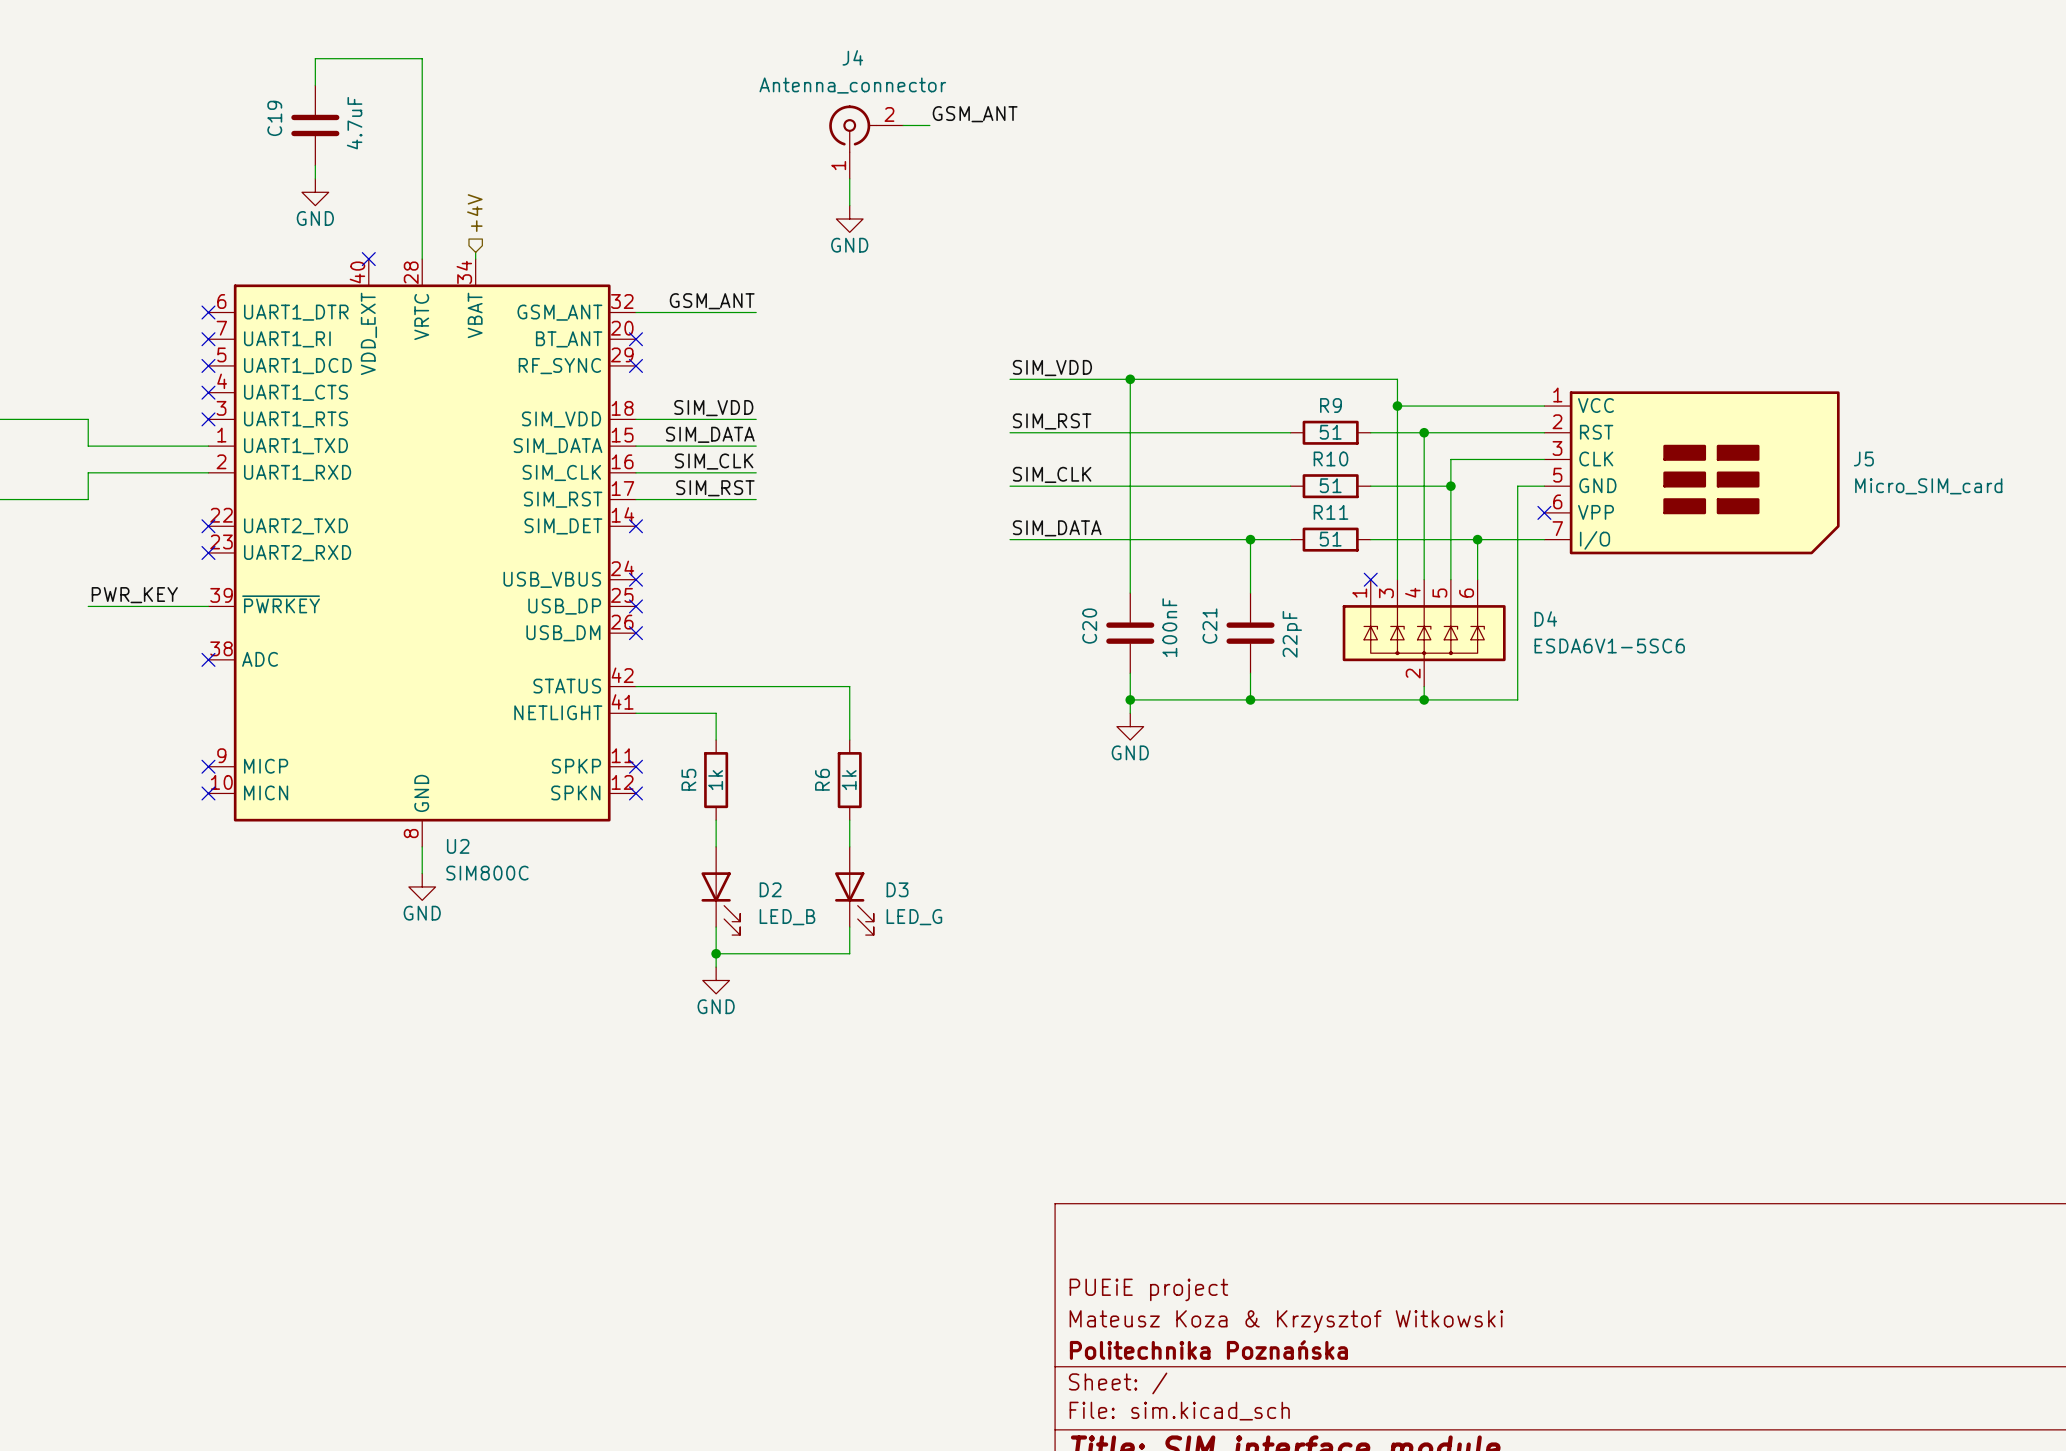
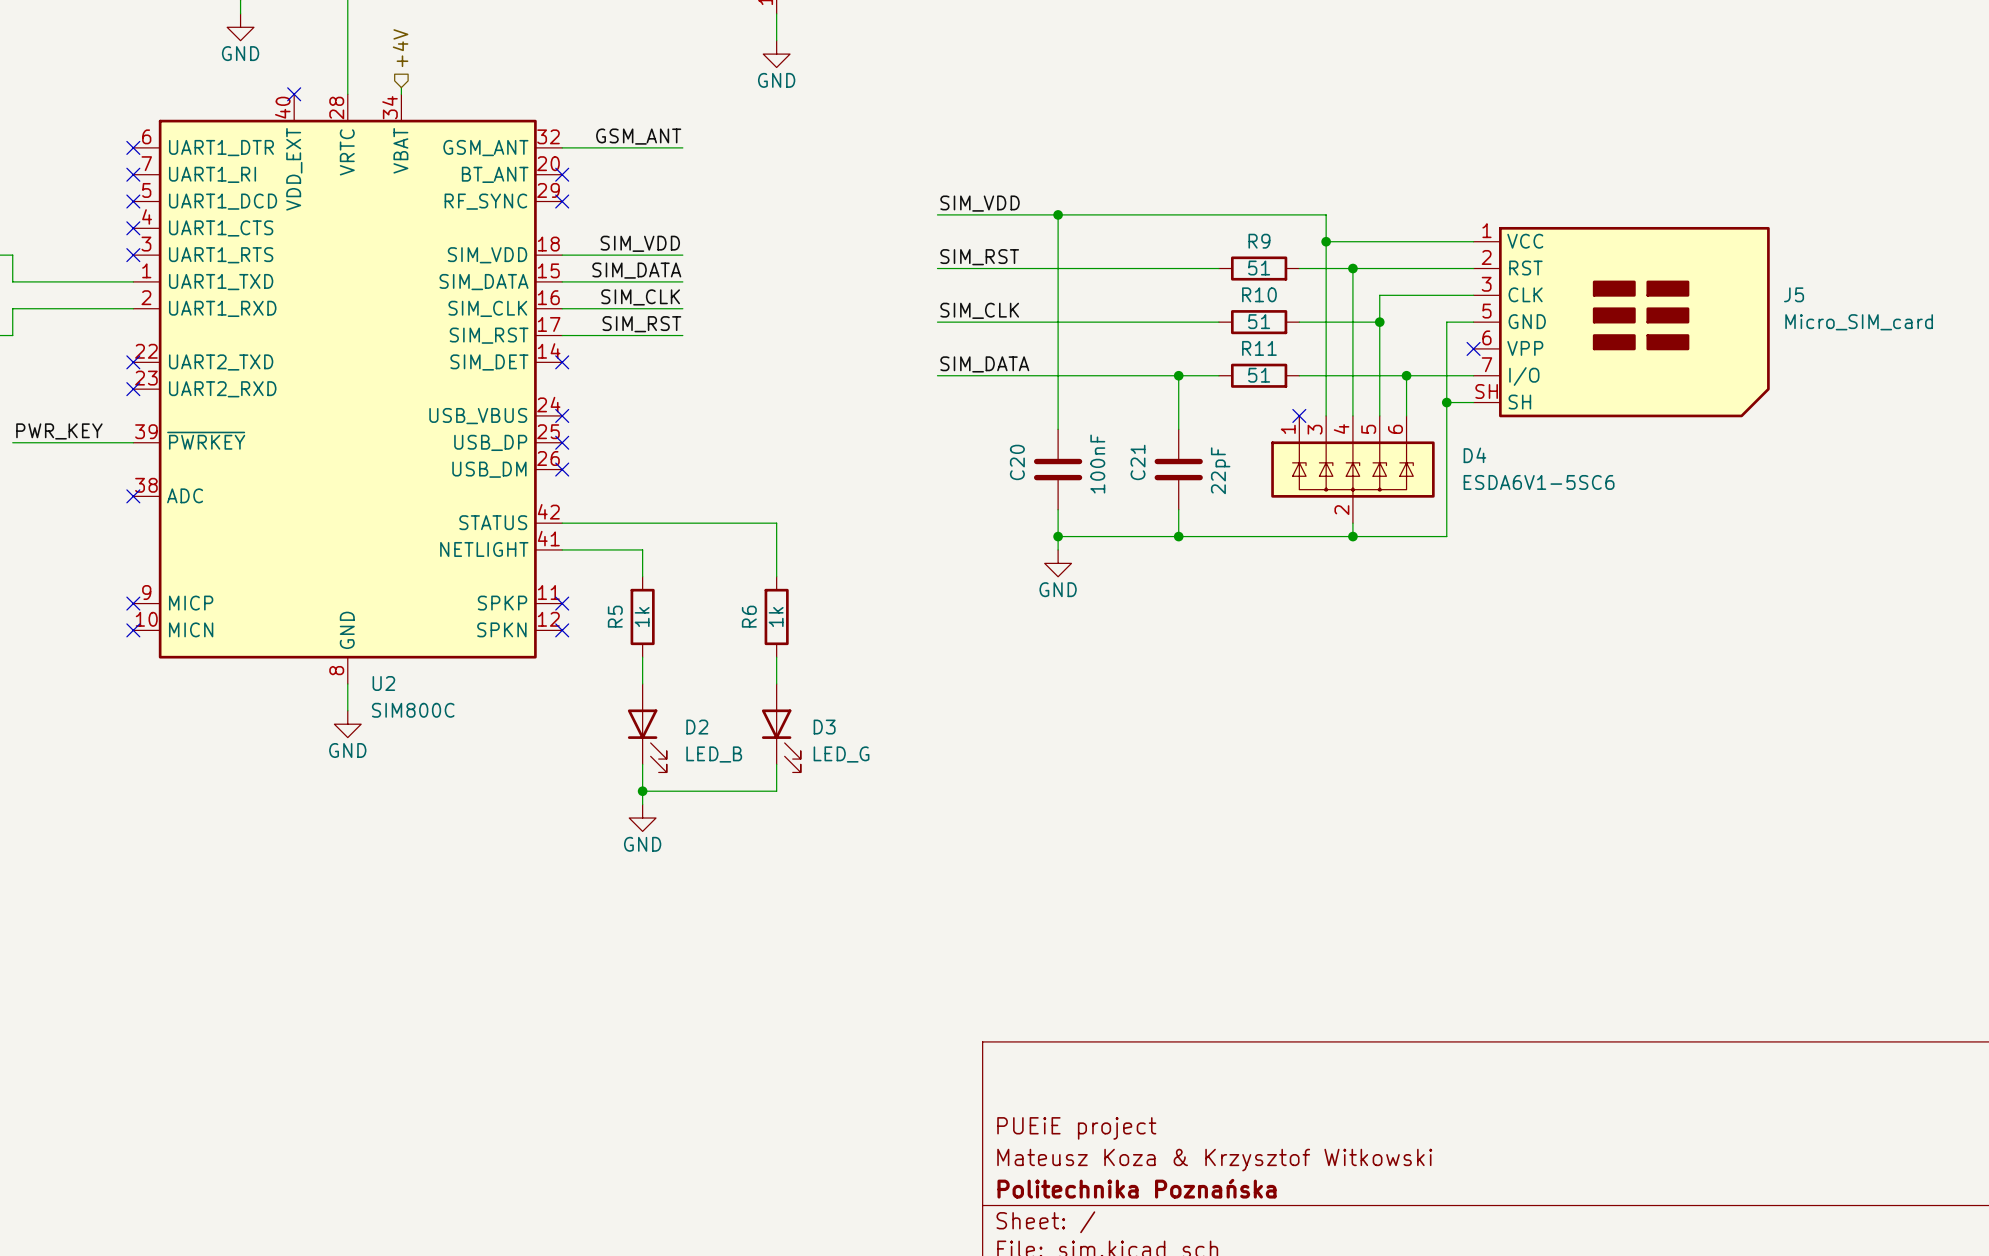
J5 symbol: [1544, 391, 1840, 555] -> [1473, 226, 1770, 418]
wire: none -> (1446, 402) (1473, 402)
junction: none -> (1446, 402)

